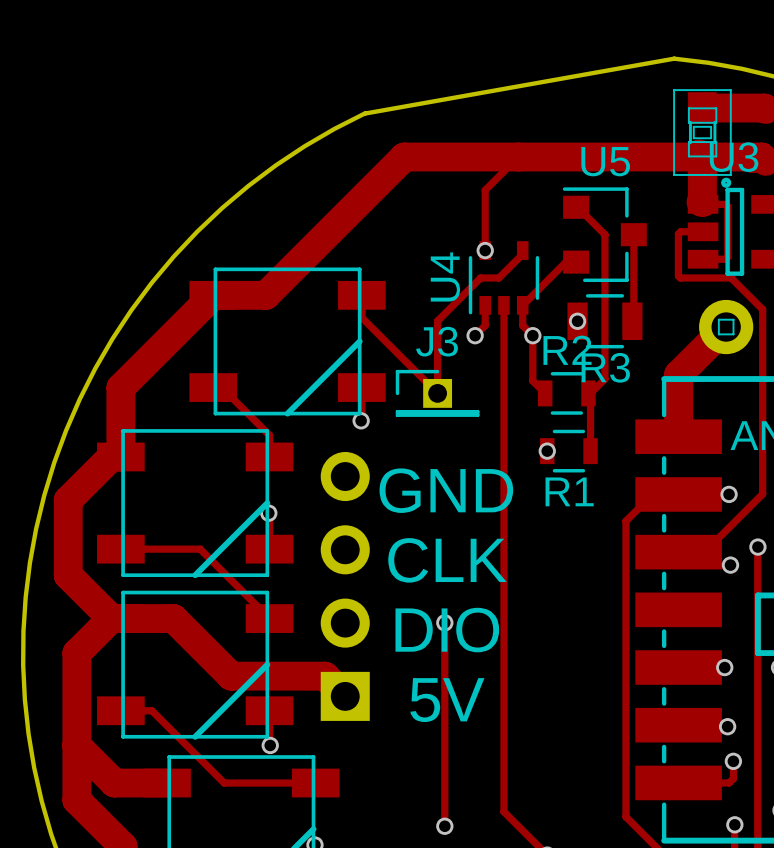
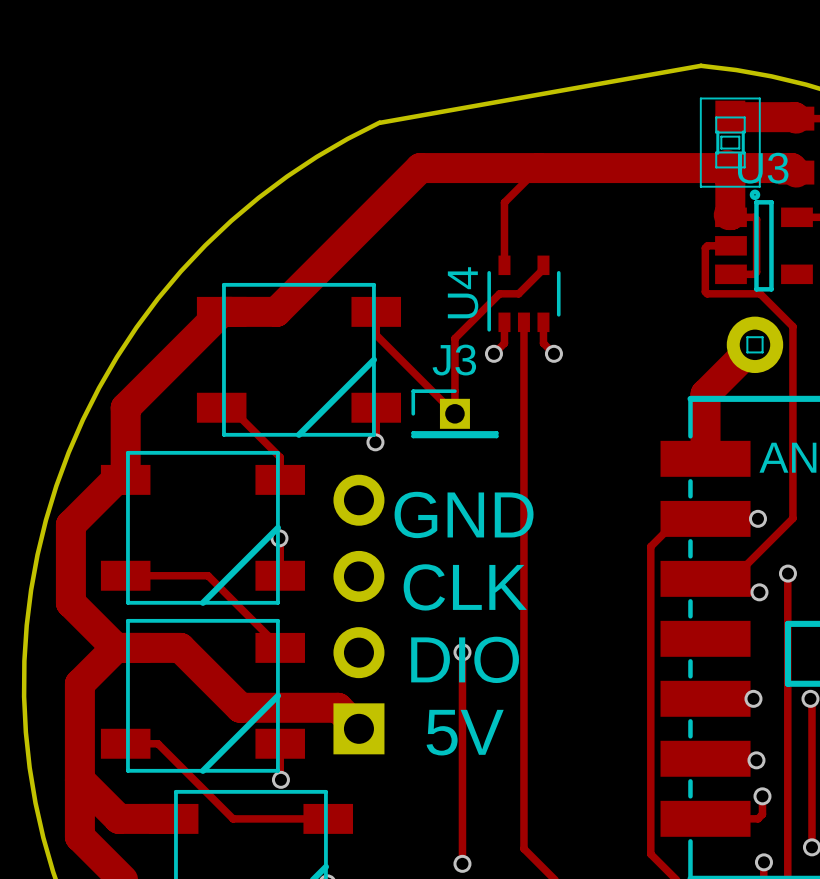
track: (576, 207) (604, 234) (604, 378) (590, 393) (590, 451) -> none
U5: (604, 234) -> none
track: (633, 234) (632, 321) -> none
via: (485, 250) -> none
track: (576, 262) (566, 262) (522, 305) -> none
via: (577, 321) -> none
R3: (604, 321) -> none
track: (532, 335) (532, 381) (545, 393) -> none
R2: (566, 393) -> none
via: (547, 451) -> none
R1: (568, 451) -> none

